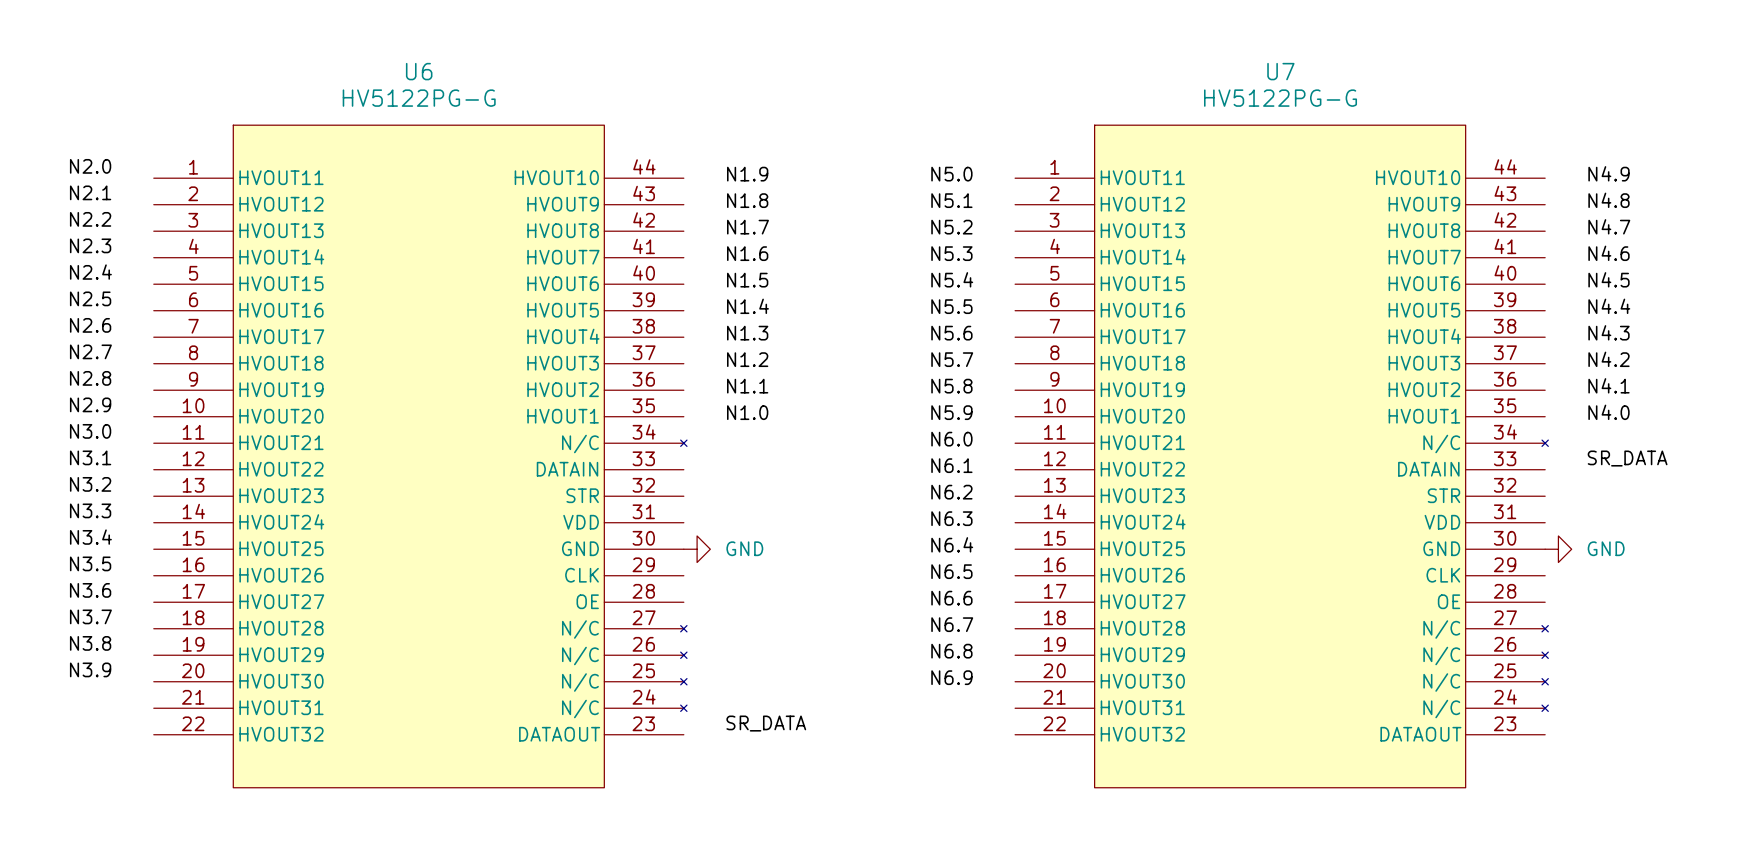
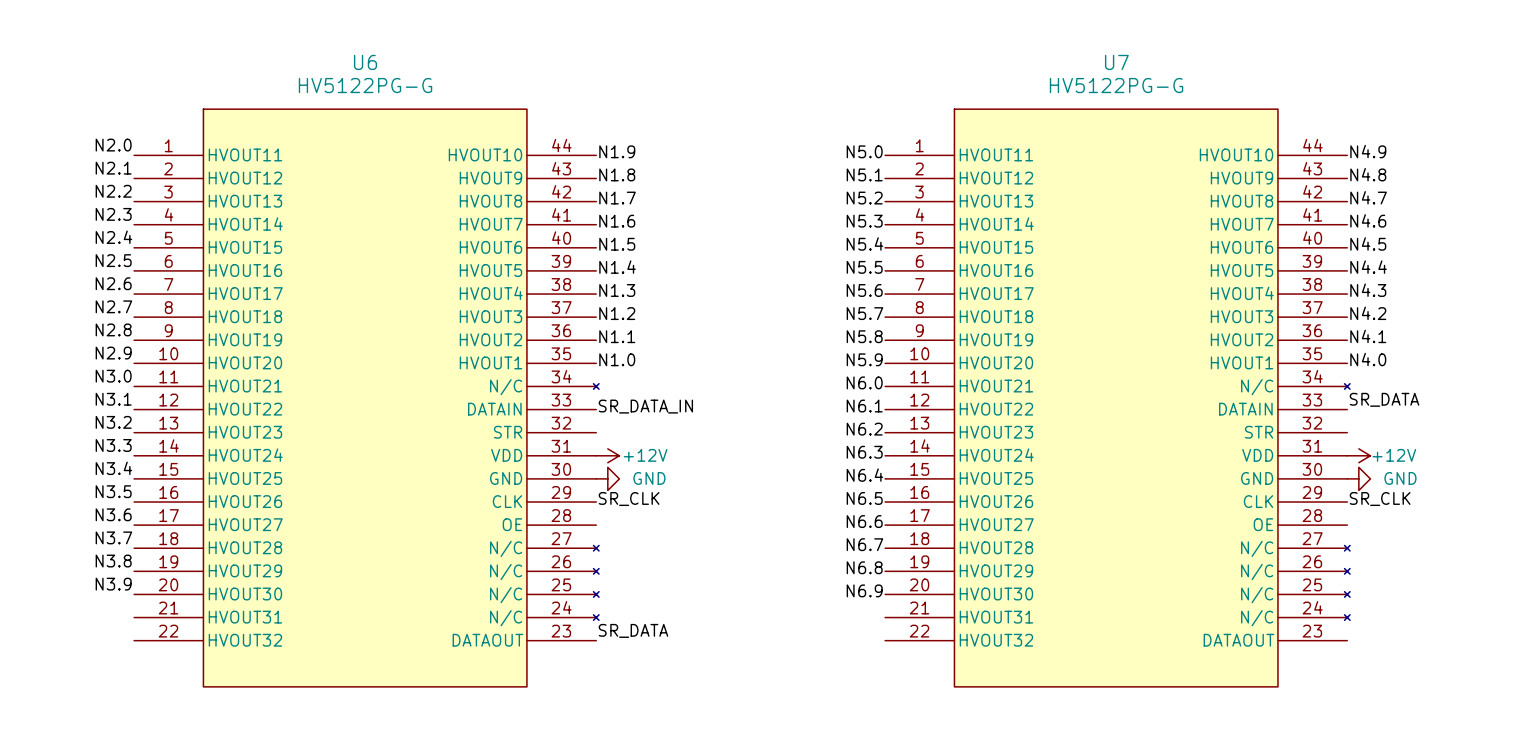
label position: N2.0 (90, 166) -> N2.0 (113, 145)
label position: N4.9 (1608, 173) -> N4.9 (1368, 151)
label position: N1.9 (747, 174) -> N1.9 (617, 151)
label position: N5.0 (951, 174) -> N5.0 (864, 151)
label position: N2.1 (90, 192) -> N2.1 (113, 168)
label position: N1.8 (747, 200) -> N1.8 (617, 174)
label position: N5.1 (951, 200) -> N5.1 (864, 174)
label position: N4.8 (1608, 200) -> N4.8 (1368, 174)
label position: N2.2 (90, 219) -> N2.2 (113, 191)
label position: N4.7 (1609, 226) -> N4.7 (1368, 197)
label position: N1.7 (747, 227) -> N1.7 (617, 198)
label position: N5.2 (951, 227) -> N5.2 (864, 198)
label position: N2.3 (90, 245) -> N2.3 (113, 214)
label position: N1.6 (747, 253) -> N1.6 (617, 221)
label position: N5.3 (951, 253) -> N5.3 (864, 221)
label position: N4.6 (1608, 253) -> N4.6 (1368, 220)
label position: N2.4 (90, 272) -> N2.4 (113, 237)
label position: N5.4 (952, 279) -> N5.4 (864, 243)
label position: N4.5 (1608, 279) -> N4.5 (1368, 243)
label position: N1.5 (747, 280) -> N1.5 (617, 244)
label position: N2.5 (90, 298) -> N2.5 (113, 260)
label position: N1.4 (747, 306) -> N1.4 (617, 267)
label position: N5.5 (951, 306) -> N5.5 (864, 267)
label position: N4.4 (1609, 306) -> N4.4 (1368, 267)
label position: N2.6 (90, 325) -> N2.6 (113, 283)
label position: N4.3 (1608, 332) -> N4.3 (1368, 290)
label position: N1.3 (747, 333) -> N1.3 (617, 290)
label position: N5.6 (951, 333) -> N5.6 (864, 290)
label position: N2.7 (90, 351) -> N2.7 (113, 306)
label position: N1.2 (747, 359) -> N1.2 (617, 313)
label position: N5.7 (952, 359) -> N5.7 (864, 313)
label position: N4.2 (1608, 359) -> N4.2 (1368, 313)
label position: N2.8 (90, 378) -> N2.8 (113, 329)
label position: N4.1 (1608, 385) -> N4.1 (1368, 336)
label position: N1.1 (747, 386) -> N1.1 (617, 336)
label position: N5.8 (951, 386) -> N5.8 (864, 336)
label position: N2.9 (90, 404) -> N2.9 (113, 353)
label position: N1.0 (747, 412) -> N1.0 (617, 359)
label position: N5.9 (951, 412) -> N5.9 (864, 359)
label position: N4.0 (1608, 412) -> N4.0 (1368, 359)
label position: N3.0 (90, 431) -> N3.0 (113, 376)
label position: N6.0 (951, 439) -> N6.0 (864, 382)
label position: N3.1 (90, 457) -> N3.1 (113, 399)
label position: SR_DATA (1627, 458) -> SR_DATA (1384, 399)
label position: N6.1 (951, 465) -> N6.1 (864, 406)
label: none -> SR_DATA_IN (645, 406)
label position: N3.2 (90, 484) -> N3.2 (113, 422)
label position: N6.2 (951, 492) -> N6.2 (864, 429)
label position: N3.3 (90, 510) -> N3.3 (113, 445)
label position: N6.3 (951, 518) -> N6.3 (864, 452)
power symbol: none -> +12V (607, 455)
power symbol: none -> +12V (1358, 455)
label position: N3.4 (90, 537) -> N3.4 (113, 468)
label position: N6.4 (952, 544) -> N6.4 (864, 475)
label position: N3.5 (90, 563) -> N3.5 (113, 491)
label position: N6.5 (951, 571) -> N6.5 (864, 498)
label: none -> SR_CLK (629, 499)
label: none -> SR_CLK (1380, 499)
label position: N3.6 (90, 590) -> N3.6 (113, 514)
label position: N6.6 (951, 598) -> N6.6 (864, 521)
label position: N3.7 (90, 616) -> N3.7 (113, 537)
label position: N6.7 (952, 624) -> N6.7 (864, 544)
label position: N3.8 (90, 643) -> N3.8 (113, 561)
label position: N6.8 (951, 651) -> N6.8 (864, 567)
label position: N3.9 (90, 669) -> N3.9 (113, 584)
label position: N6.9 (951, 677) -> N6.9 (864, 590)
label position: SR_DATA (766, 723) -> SR_DATA (633, 630)

